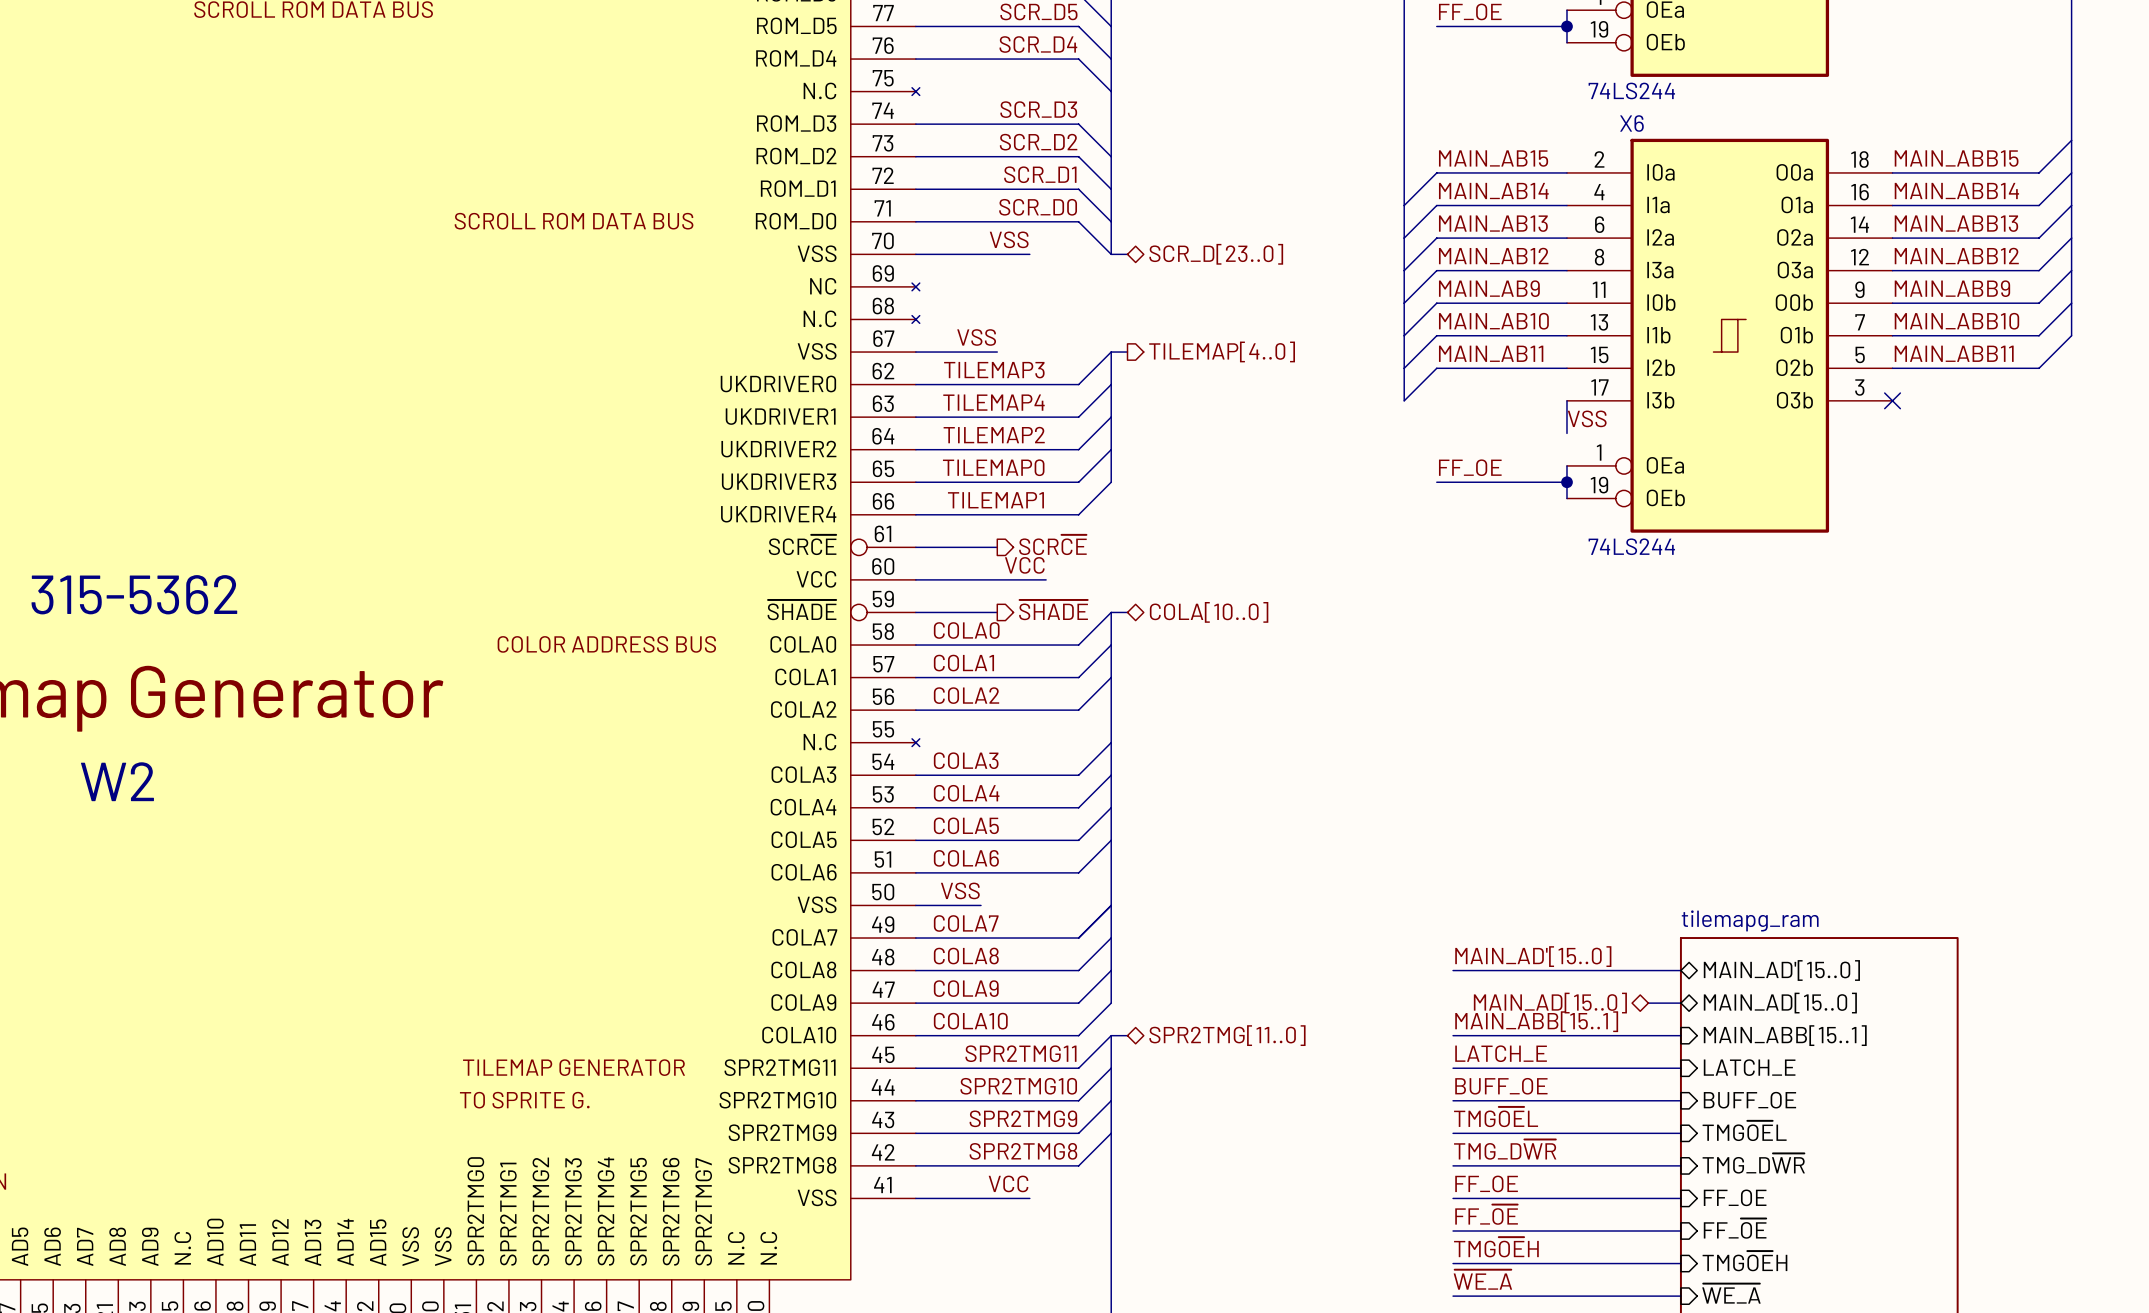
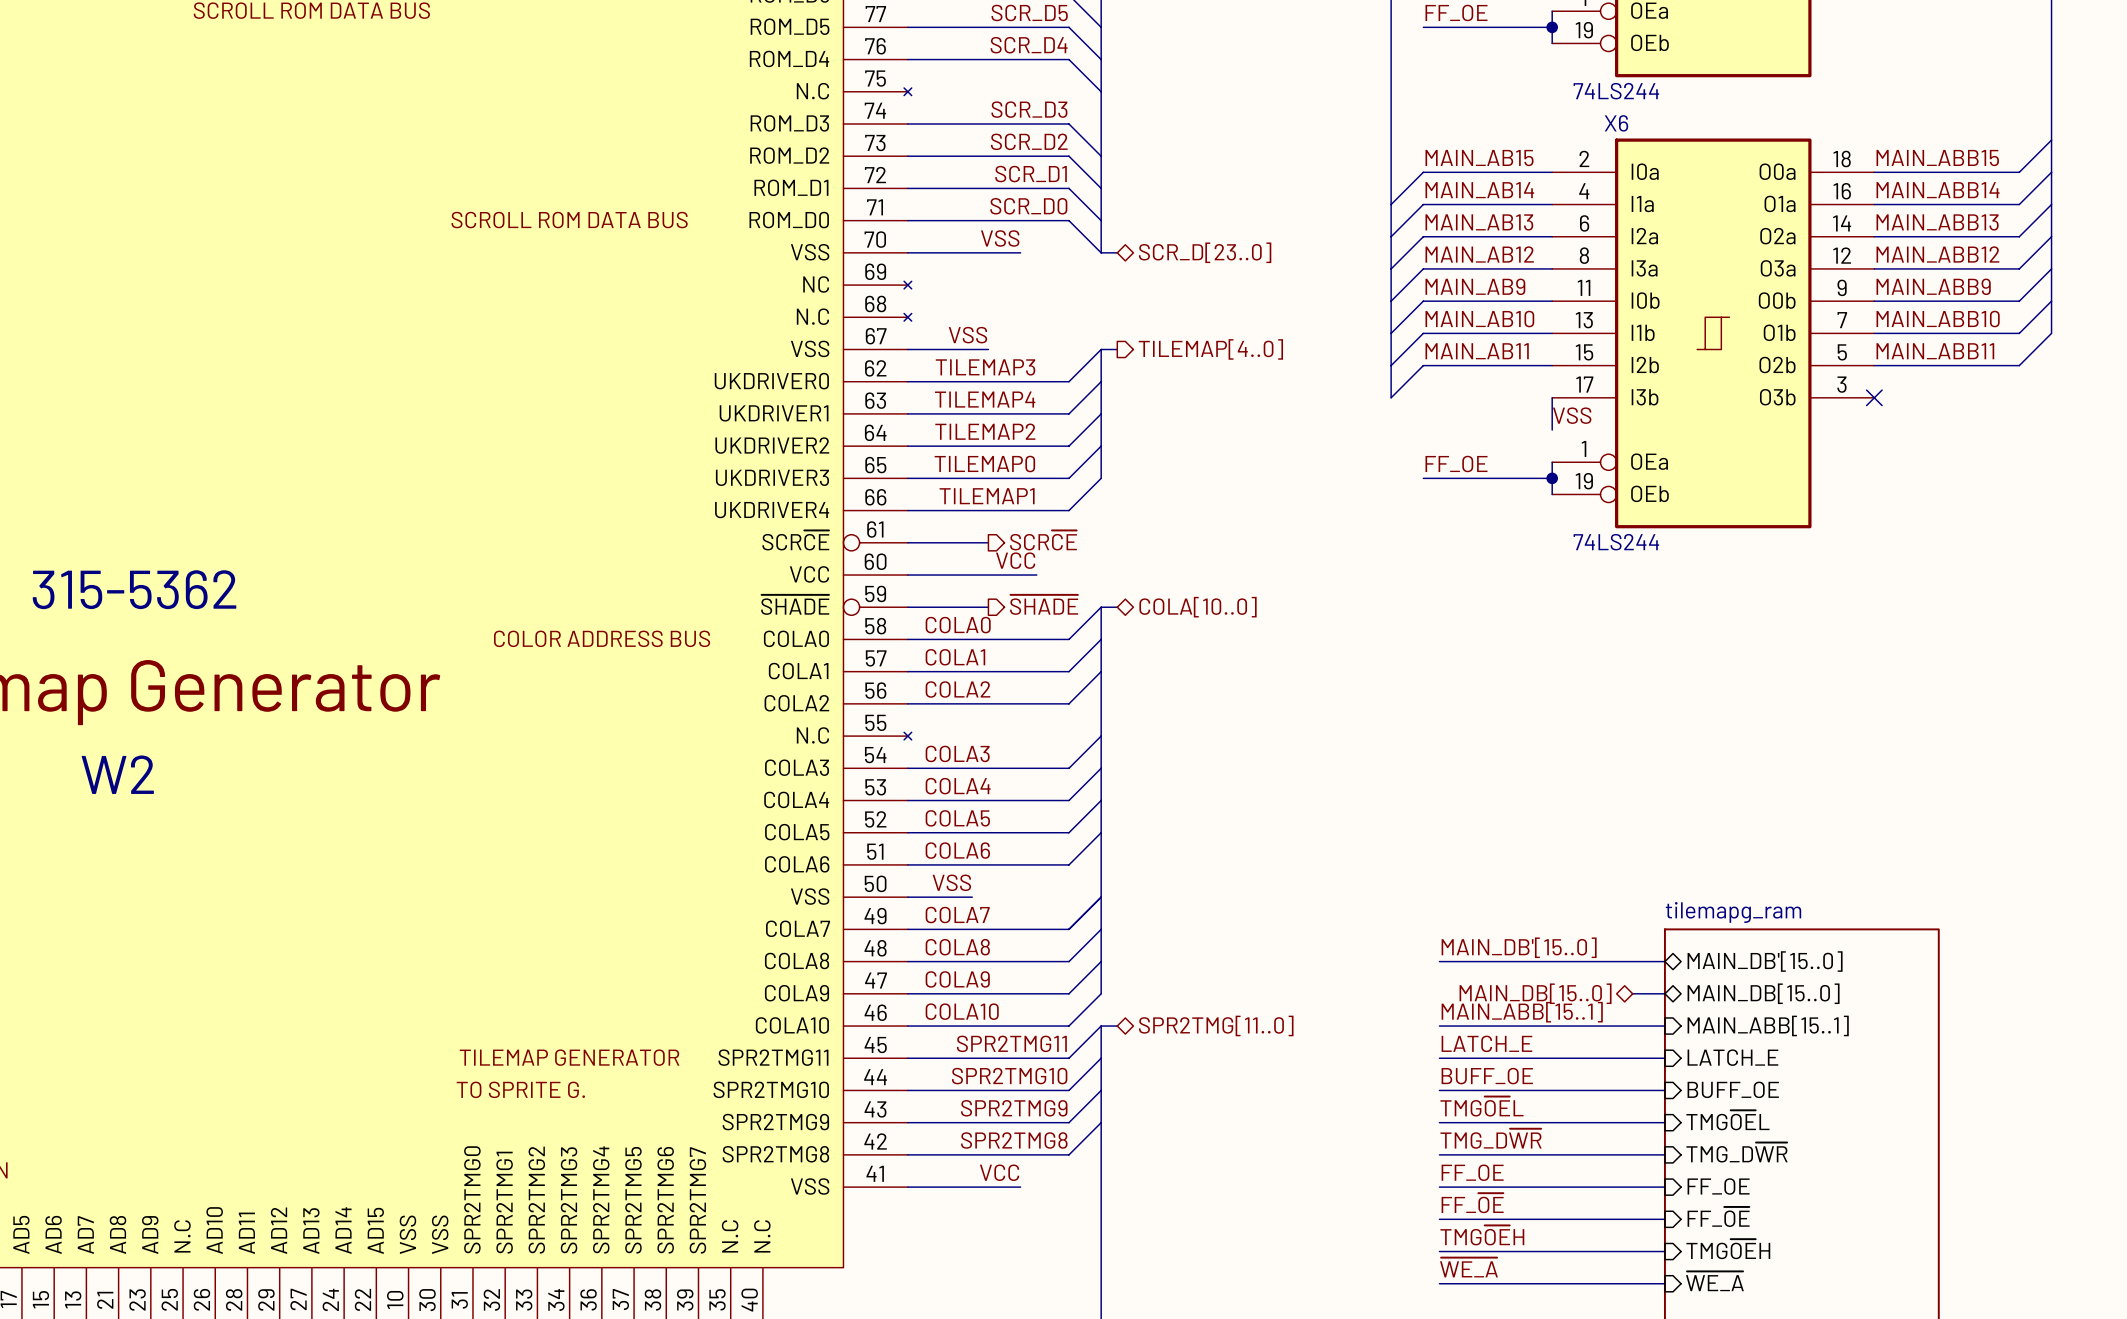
label: MAIN_AD'[15..0] (1533, 956) -> MAIN_DB'[15..0] (1519, 947)
sheet pin: MAIN_AD'[15..0] (1781, 970) -> MAIN_DB'[15..0] (1765, 961)
hierarchical label: MAIN_AD[15..0] (1550, 1003) -> MAIN_DB[15..0] (1535, 993)
sheet pin: MAIN_AD[15..0] (1780, 1003) -> MAIN_DB[15..0] (1763, 993)

